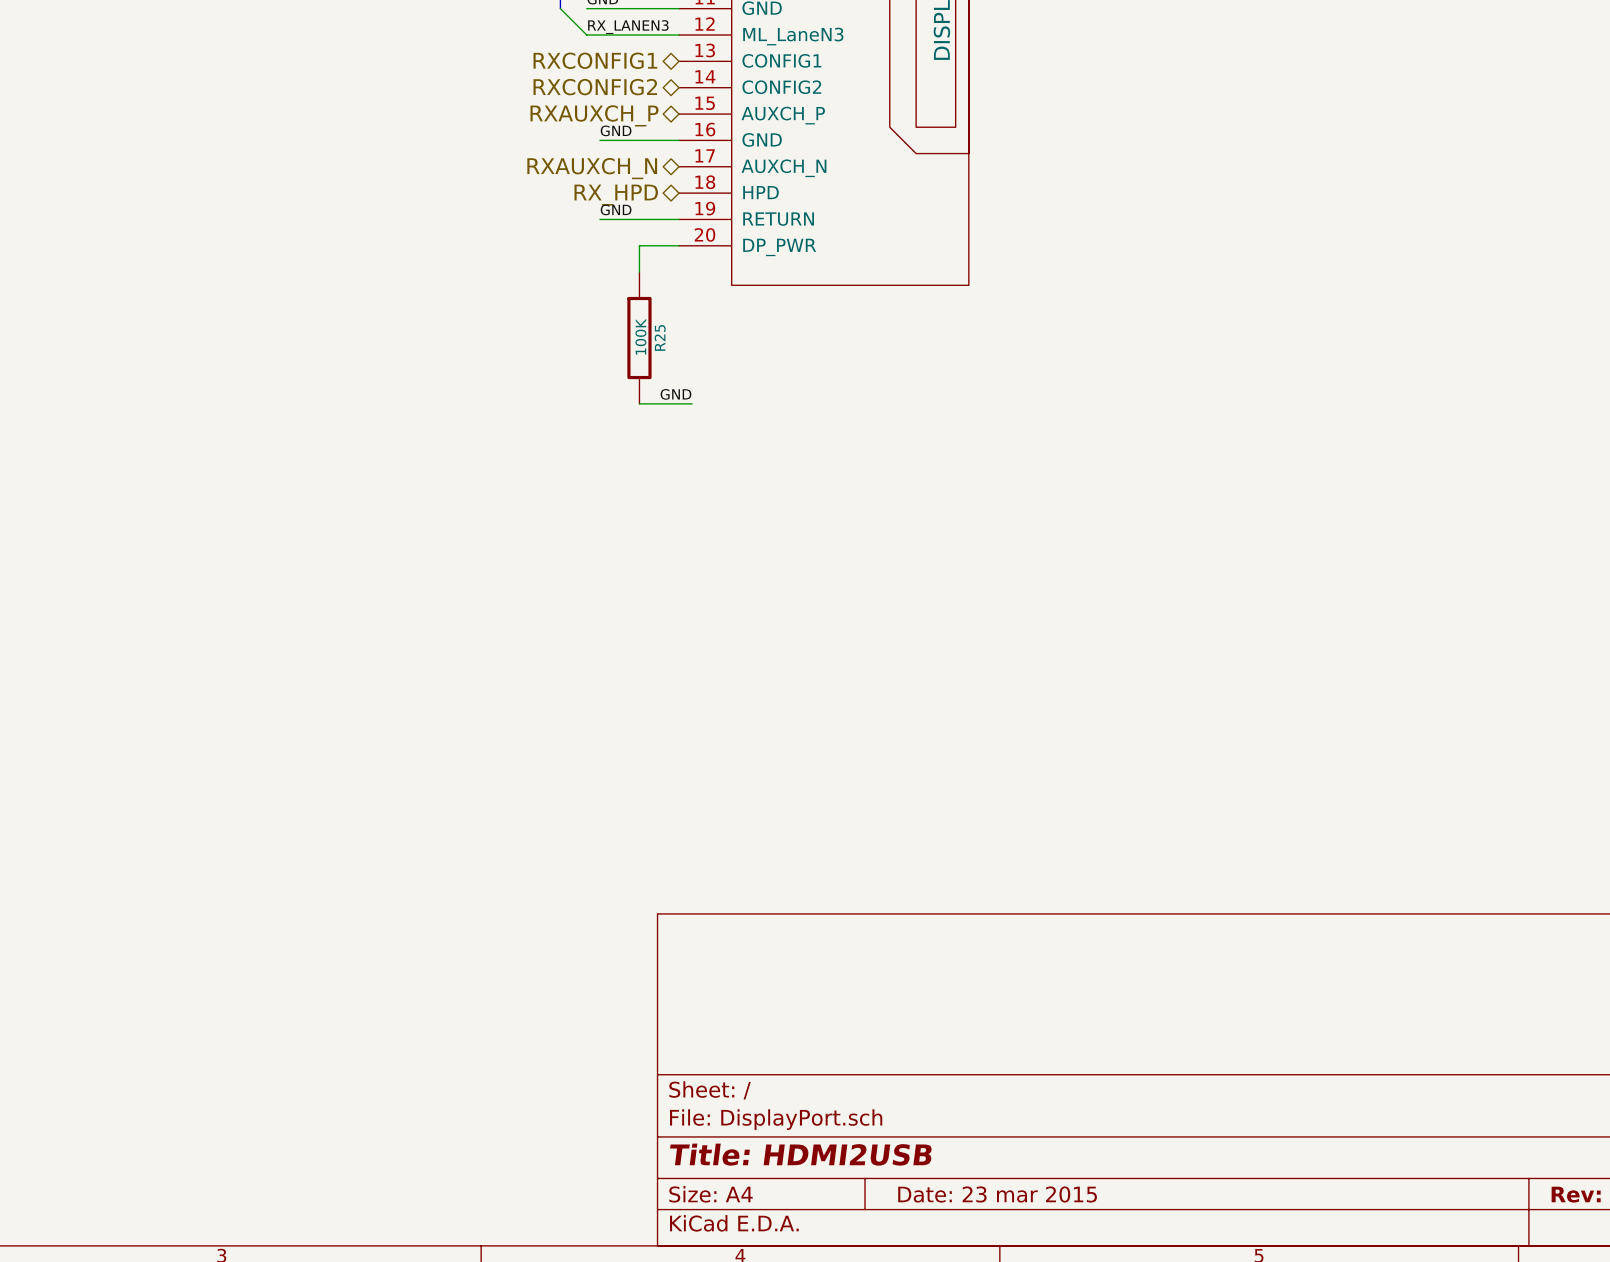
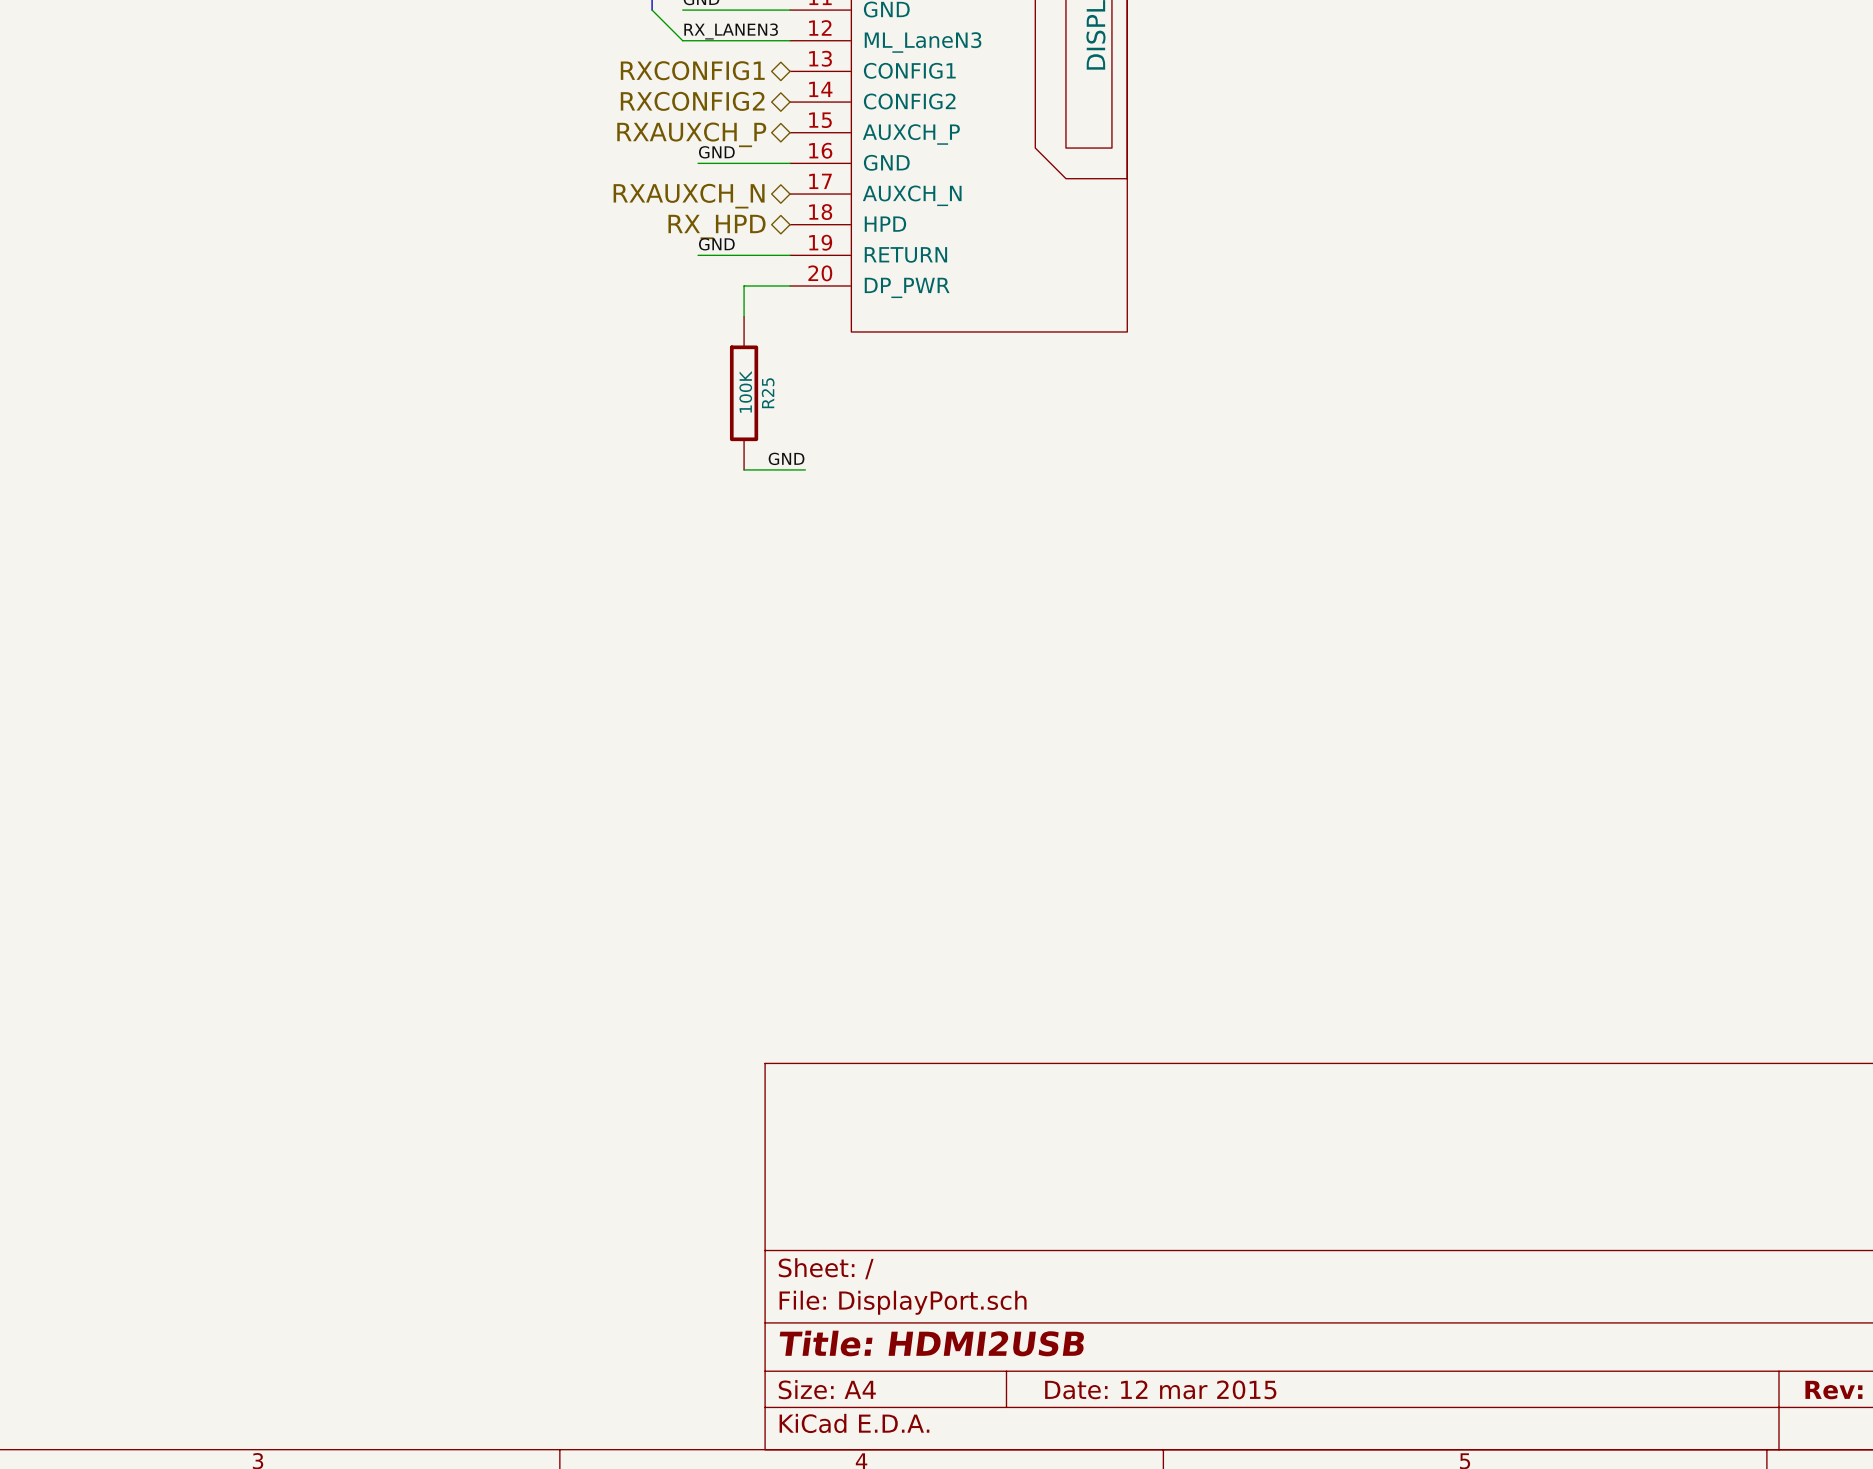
title block: Date: 23 mar 2015 (997, 1194) -> Date: 12 mar 2015 (1160, 1389)

